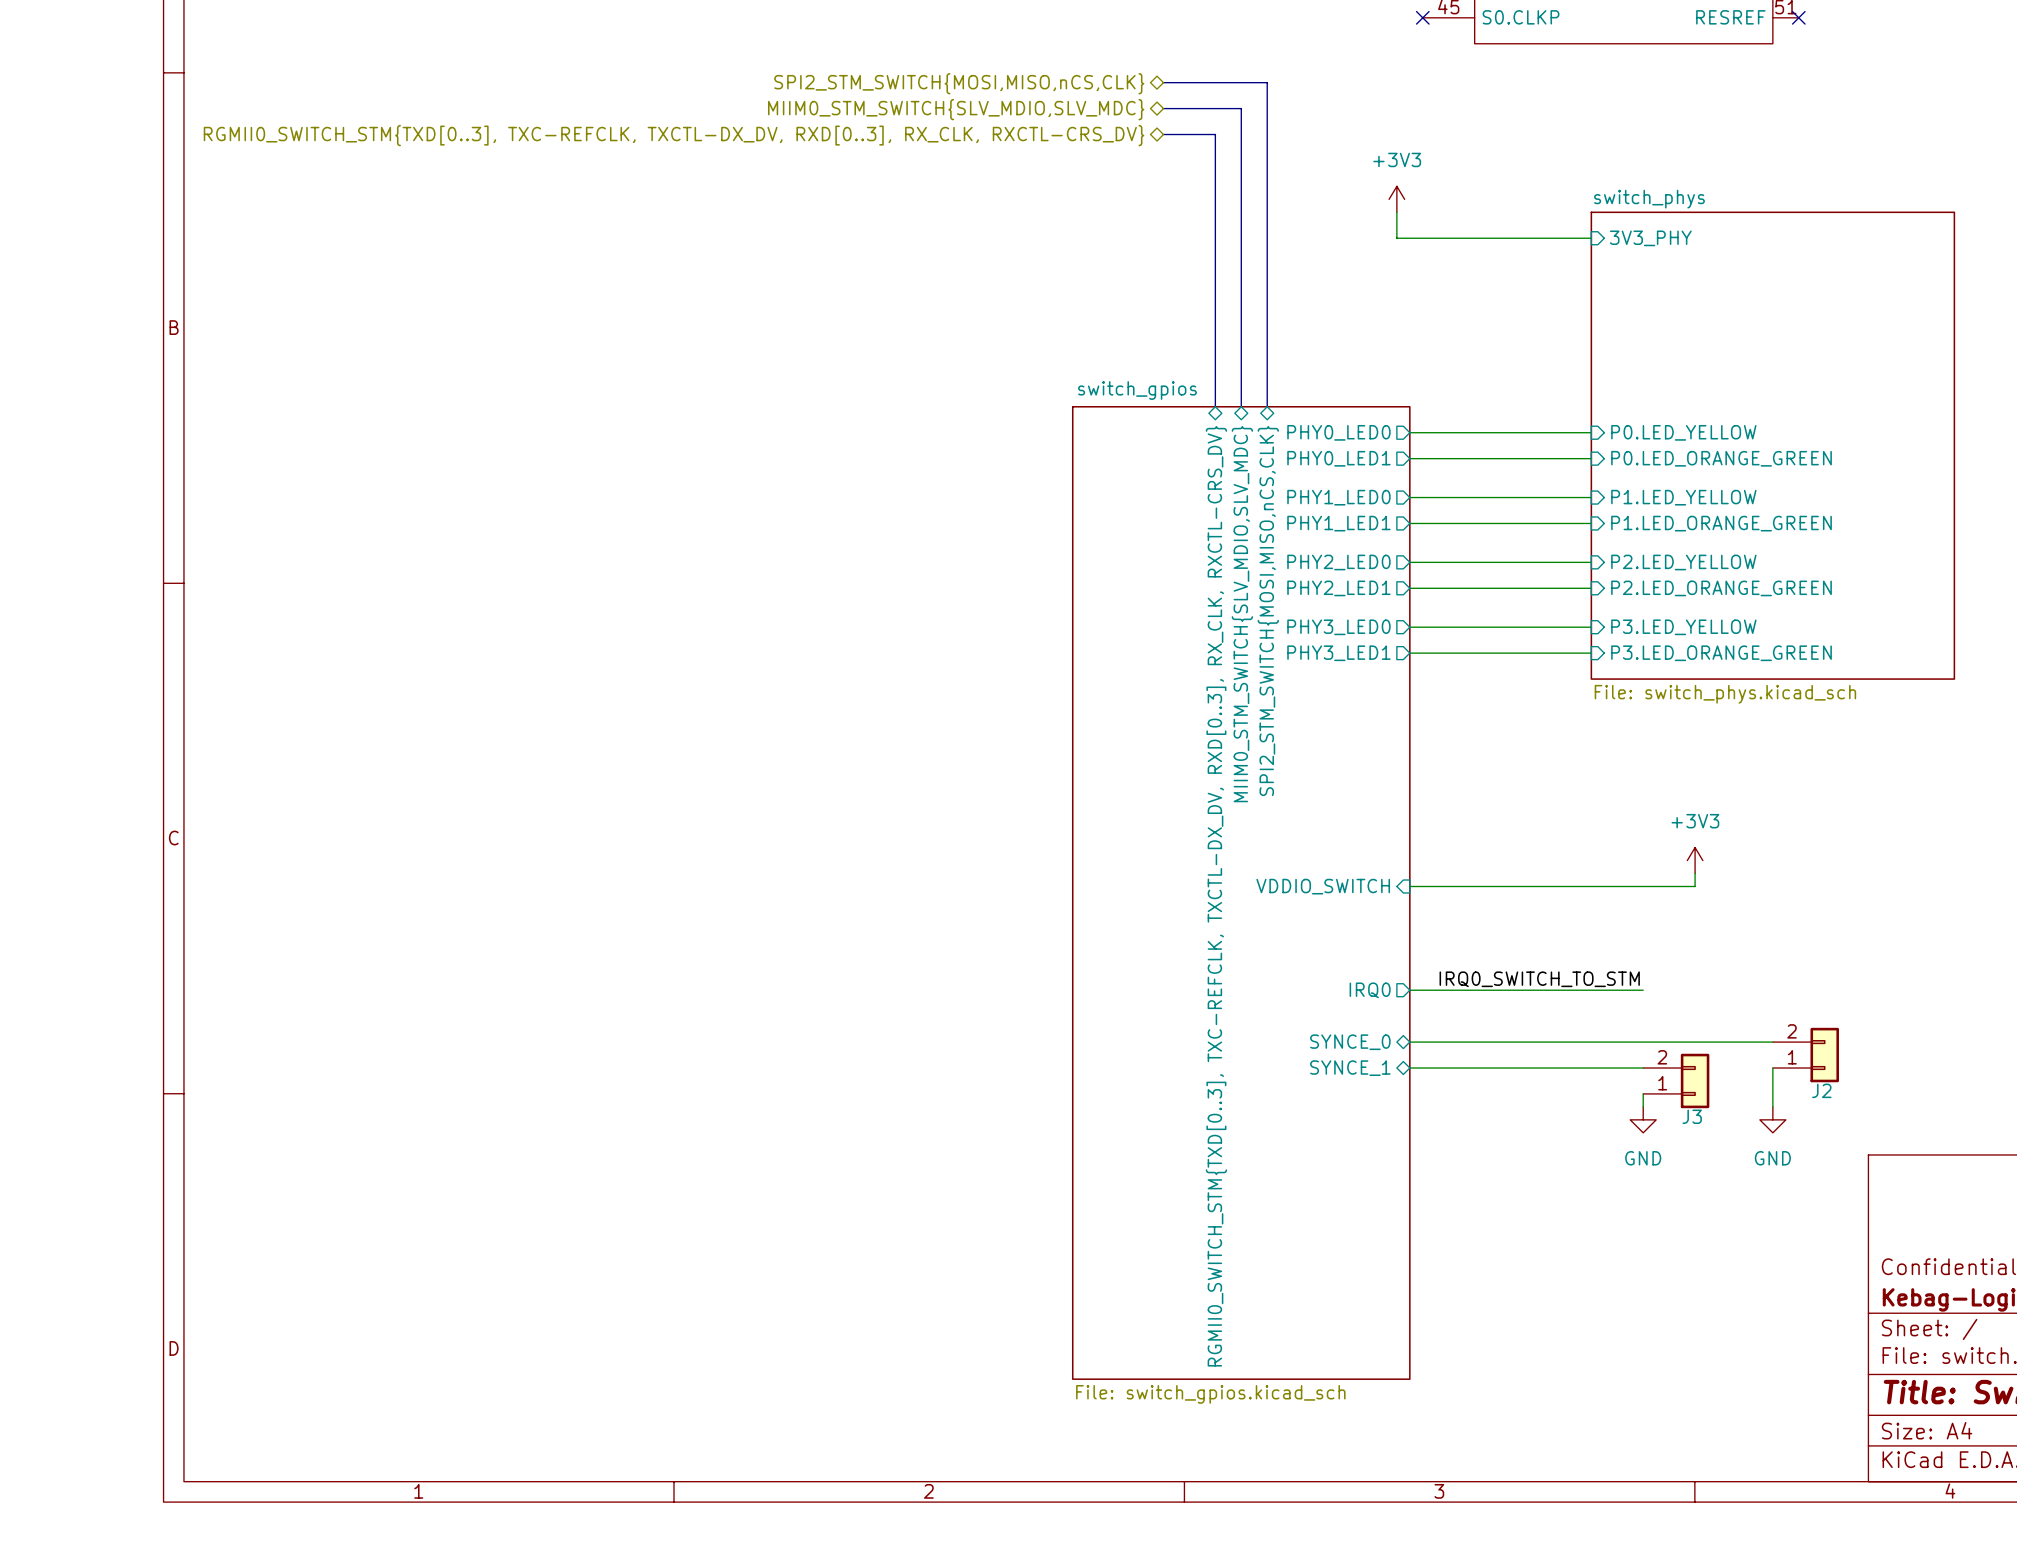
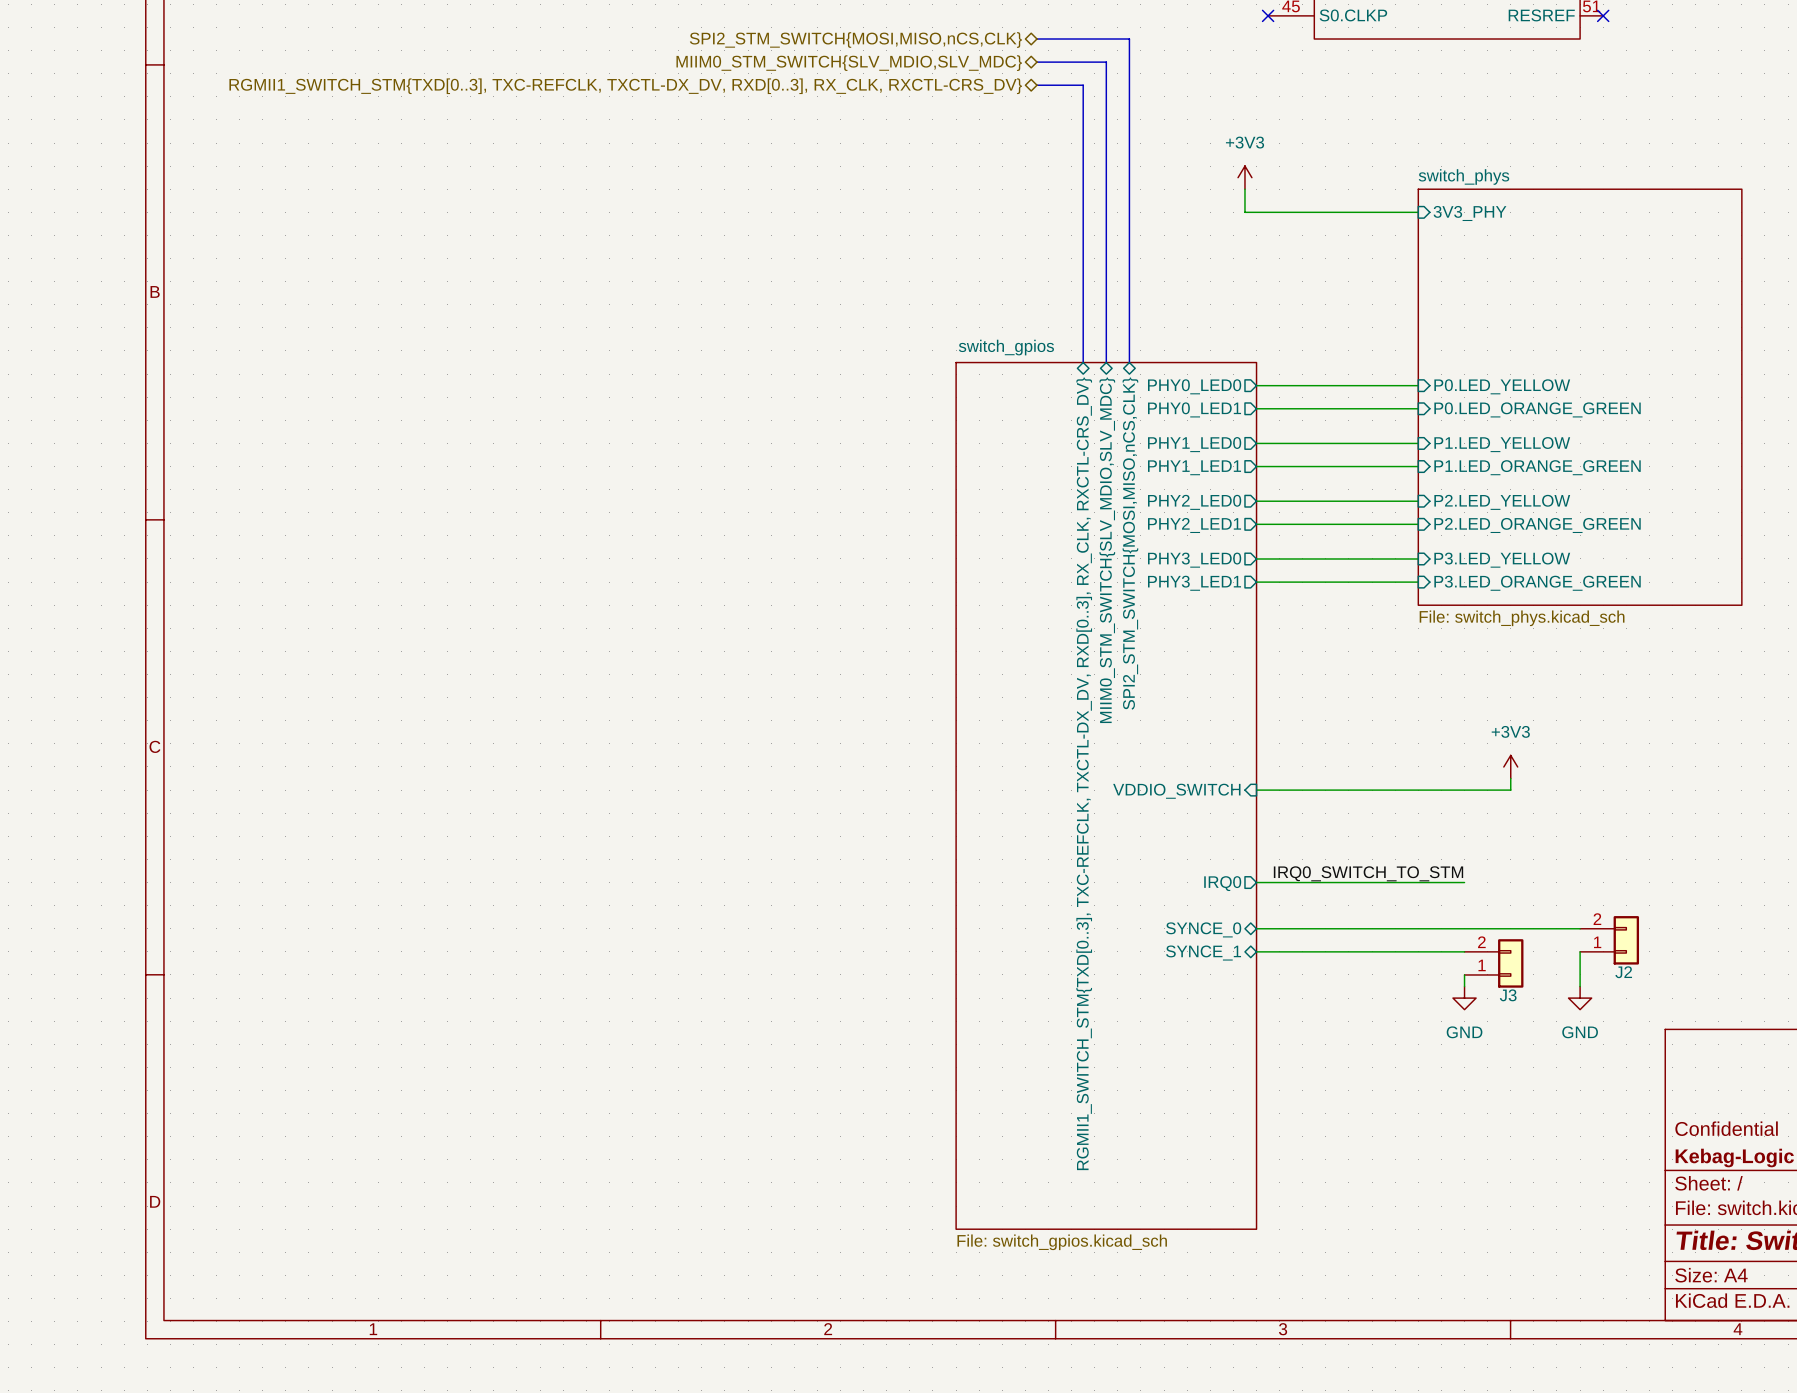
bus: (1163, 82) (1267, 82) -> (1036, 39) (1129, 39) (1129, 73)
hierarchical label position: SPI2_STM_SWITCH{MOSI,MISO,nCS,CLK} (959, 83) -> SPI2_STM_SWITCH{MOSI,MISO,nCS,CLK} (855, 40)
hierarchical label: none -> RGMII1_SWITCH_STM{TXD[0..3], TXC-REFCLK, TXCTL-DX_DV, RXD[0..3], RX_CLK, RXCTL-CRS_DV} (625, 86)
bus: (1163, 108) (1241, 108) -> (1036, 62) (1106, 62) (1106, 96)
hierarchical label position: MIIM0_STM_SWITCH{SLV_MDIO,SLV_MDC} (956, 109) -> MIIM0_STM_SWITCH{SLV_MDIO,SLV_MDC} (849, 63)
bus: (1163, 134) (1215, 134) -> (1036, 85) (1083, 85) (1083, 119)
hierarchical label: RGMII0_SWITCH_STM{TXD[0..3], TXC-REFCLK, TXCTL-DX_DV, RXD[0..3], RX_CLK, RXCTL-CRS_DV} (674, 135) -> none
sheet pin: RGMII0_SWITCH_STM{TXD[0..3], TXC-REFCLK, TXCTL-DX_DV, RXD[0..3], RX_CLK, RXCTL-CRS_DV} (1216, 896) -> RGMII1_SWITCH_STM{TXD[0..3], TXC-REFCLK, TXCTL-DX_DV, RXD[0..3], RX_CLK, RXCTL-CRS_DV} (1084, 773)

